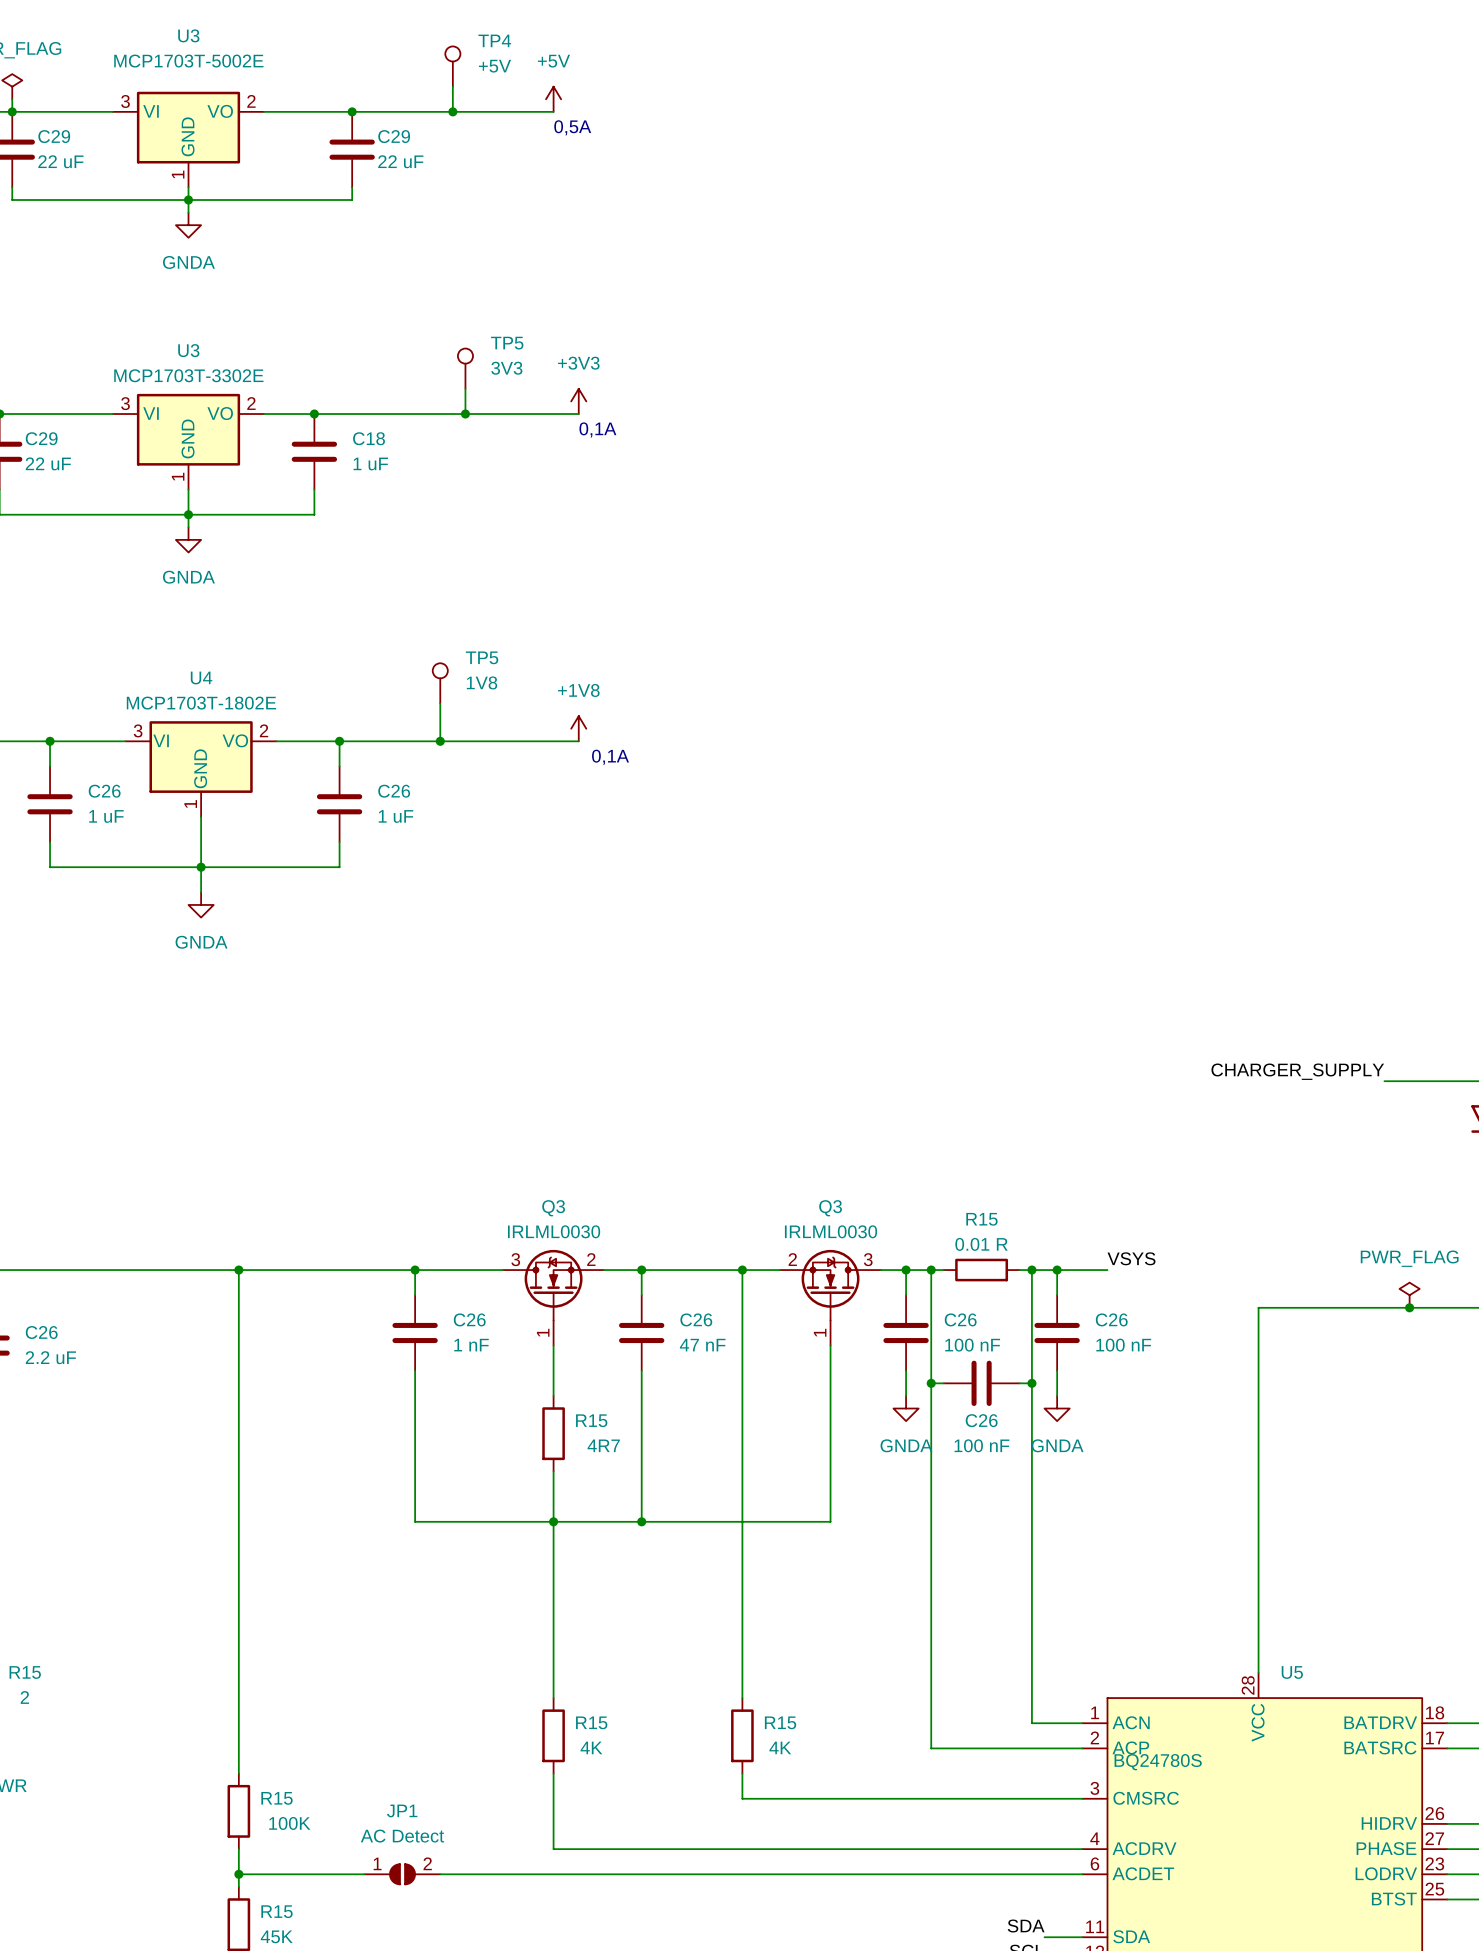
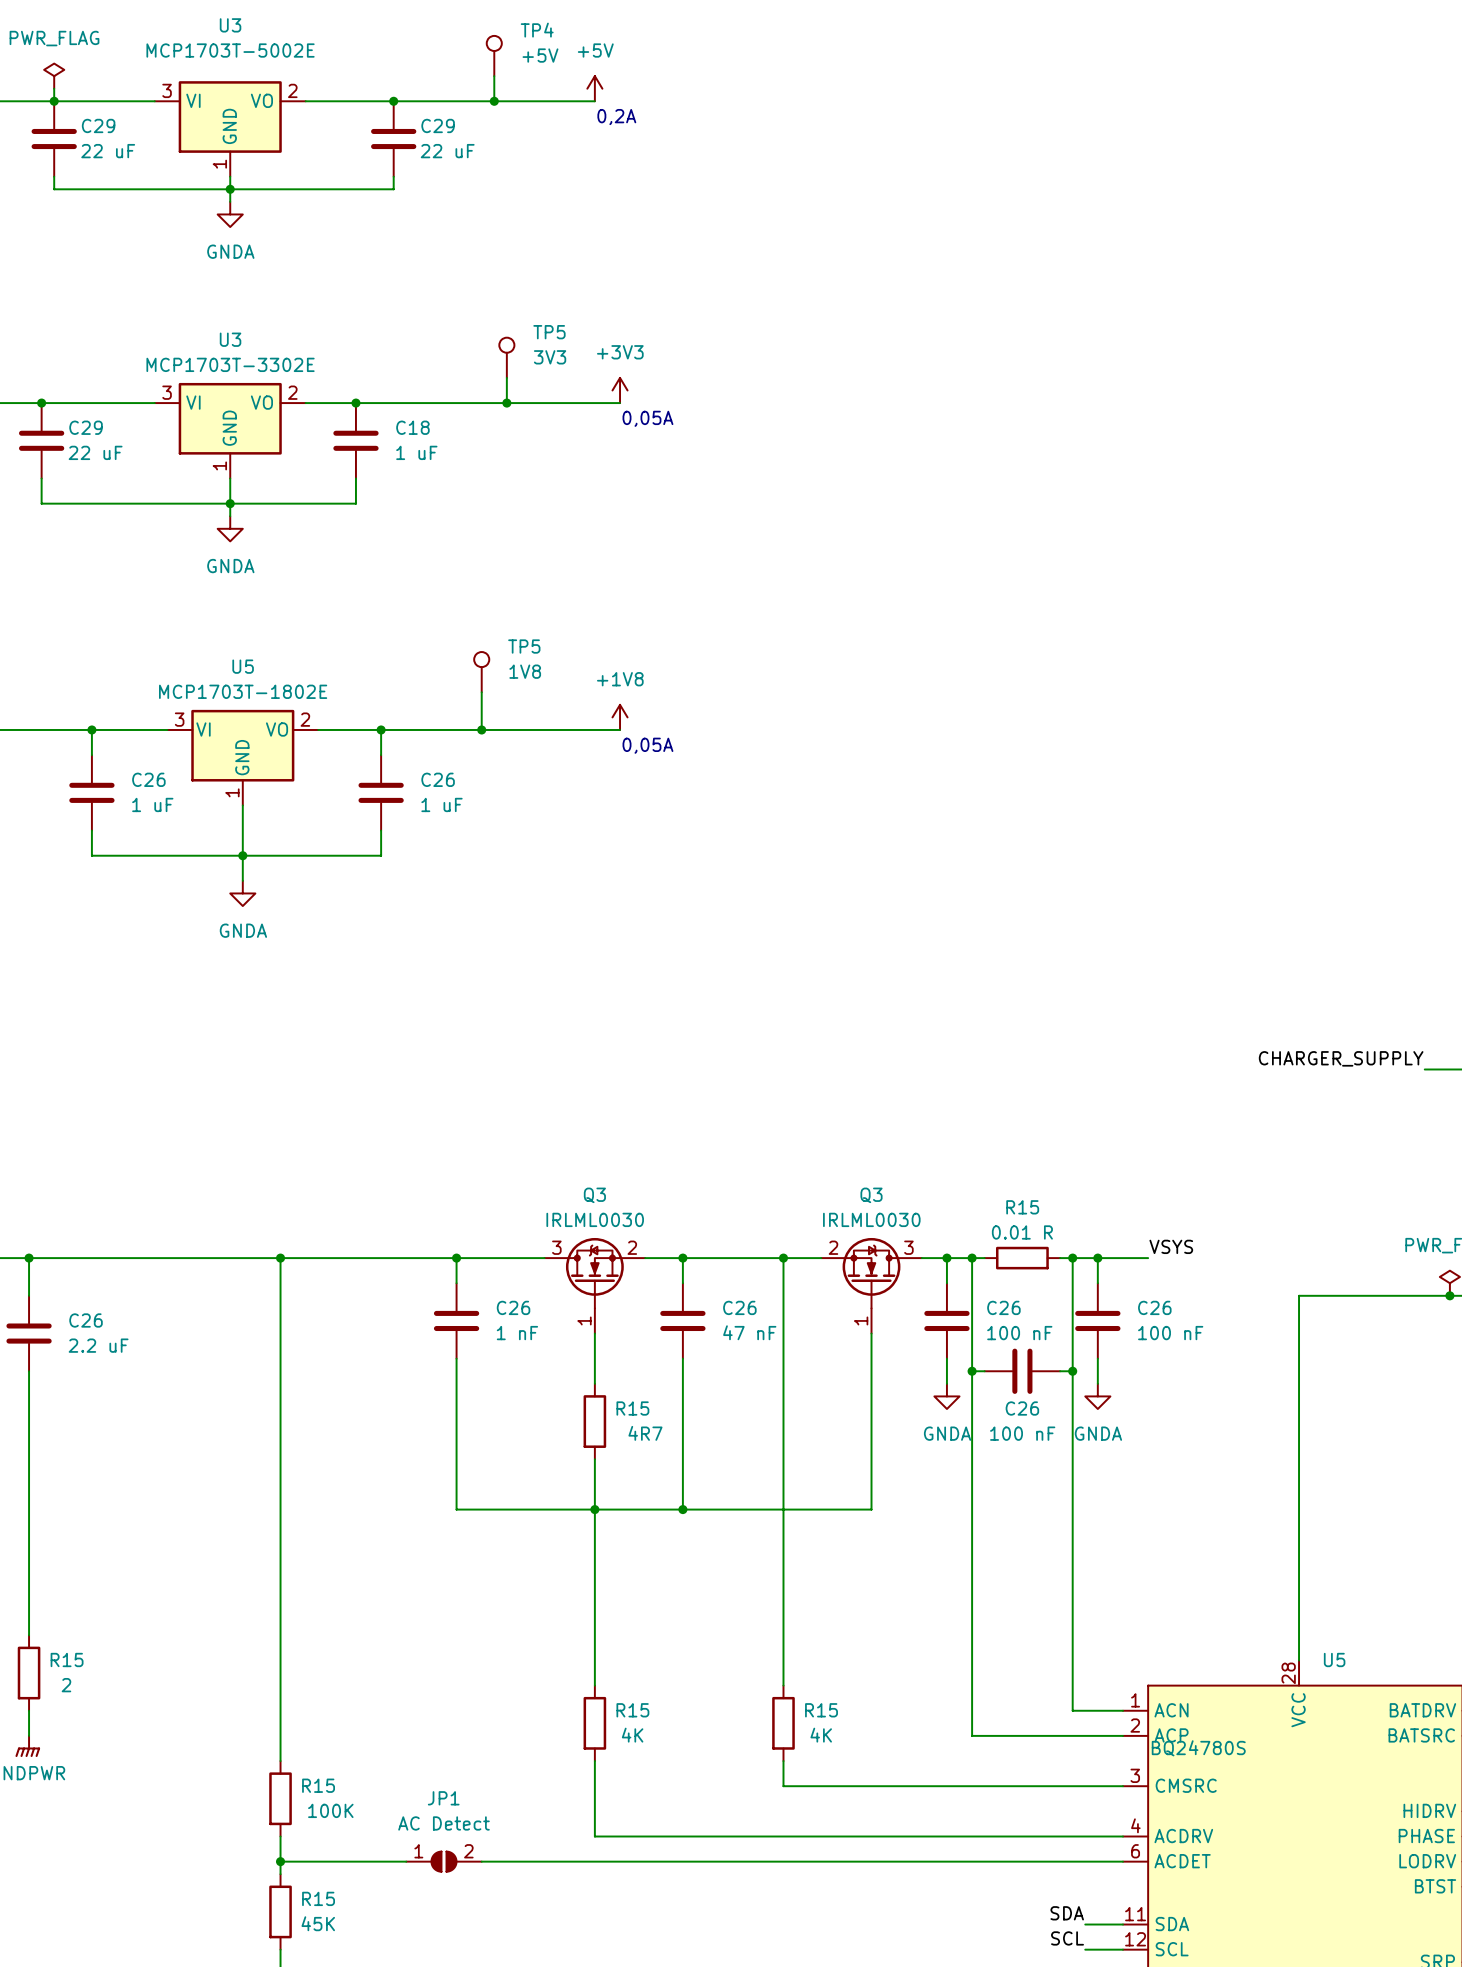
text: 0,5A (572, 127) -> 0,2A (616, 117)
text: 0,1A (597, 429) -> 0,05A (647, 418)
U4 name: U4 (201, 677) -> U5 (243, 666)
text: 0,1A (610, 757) -> 0,05A (647, 745)

